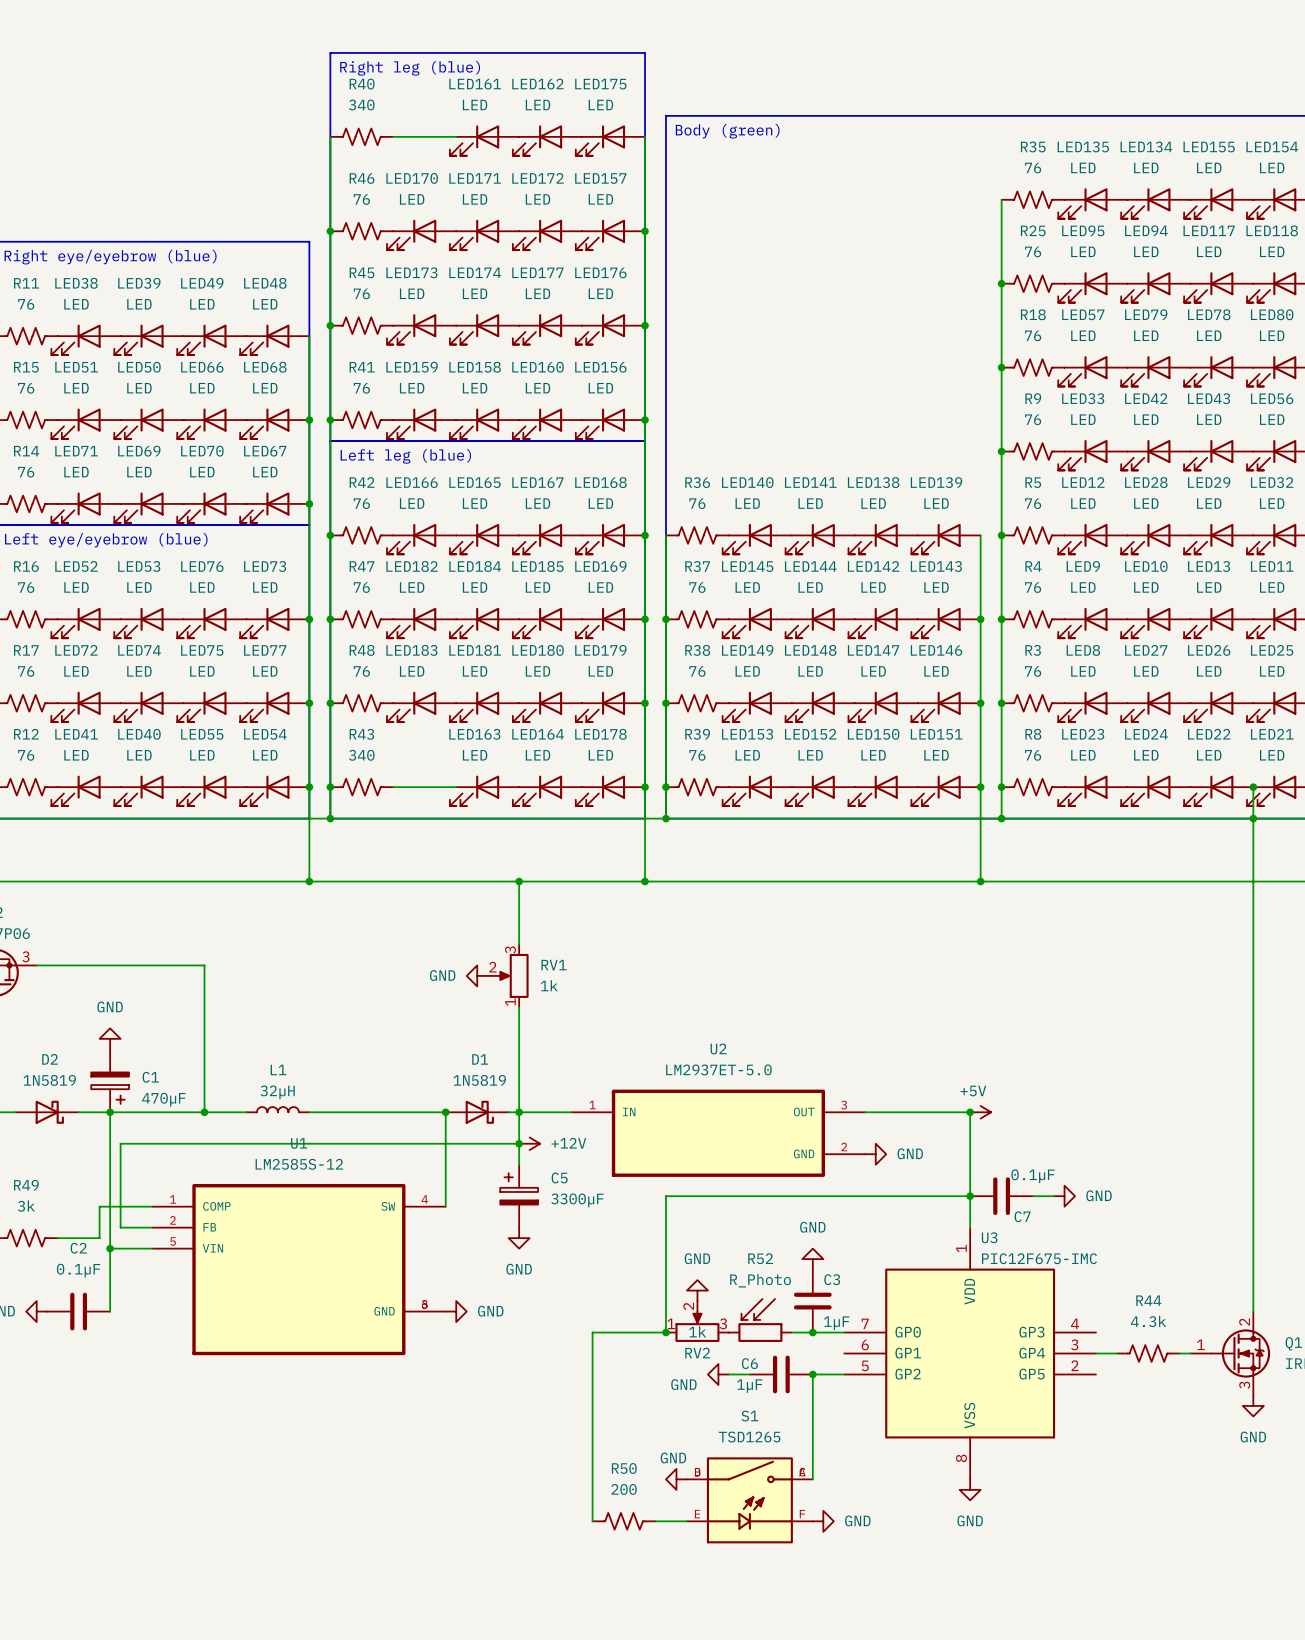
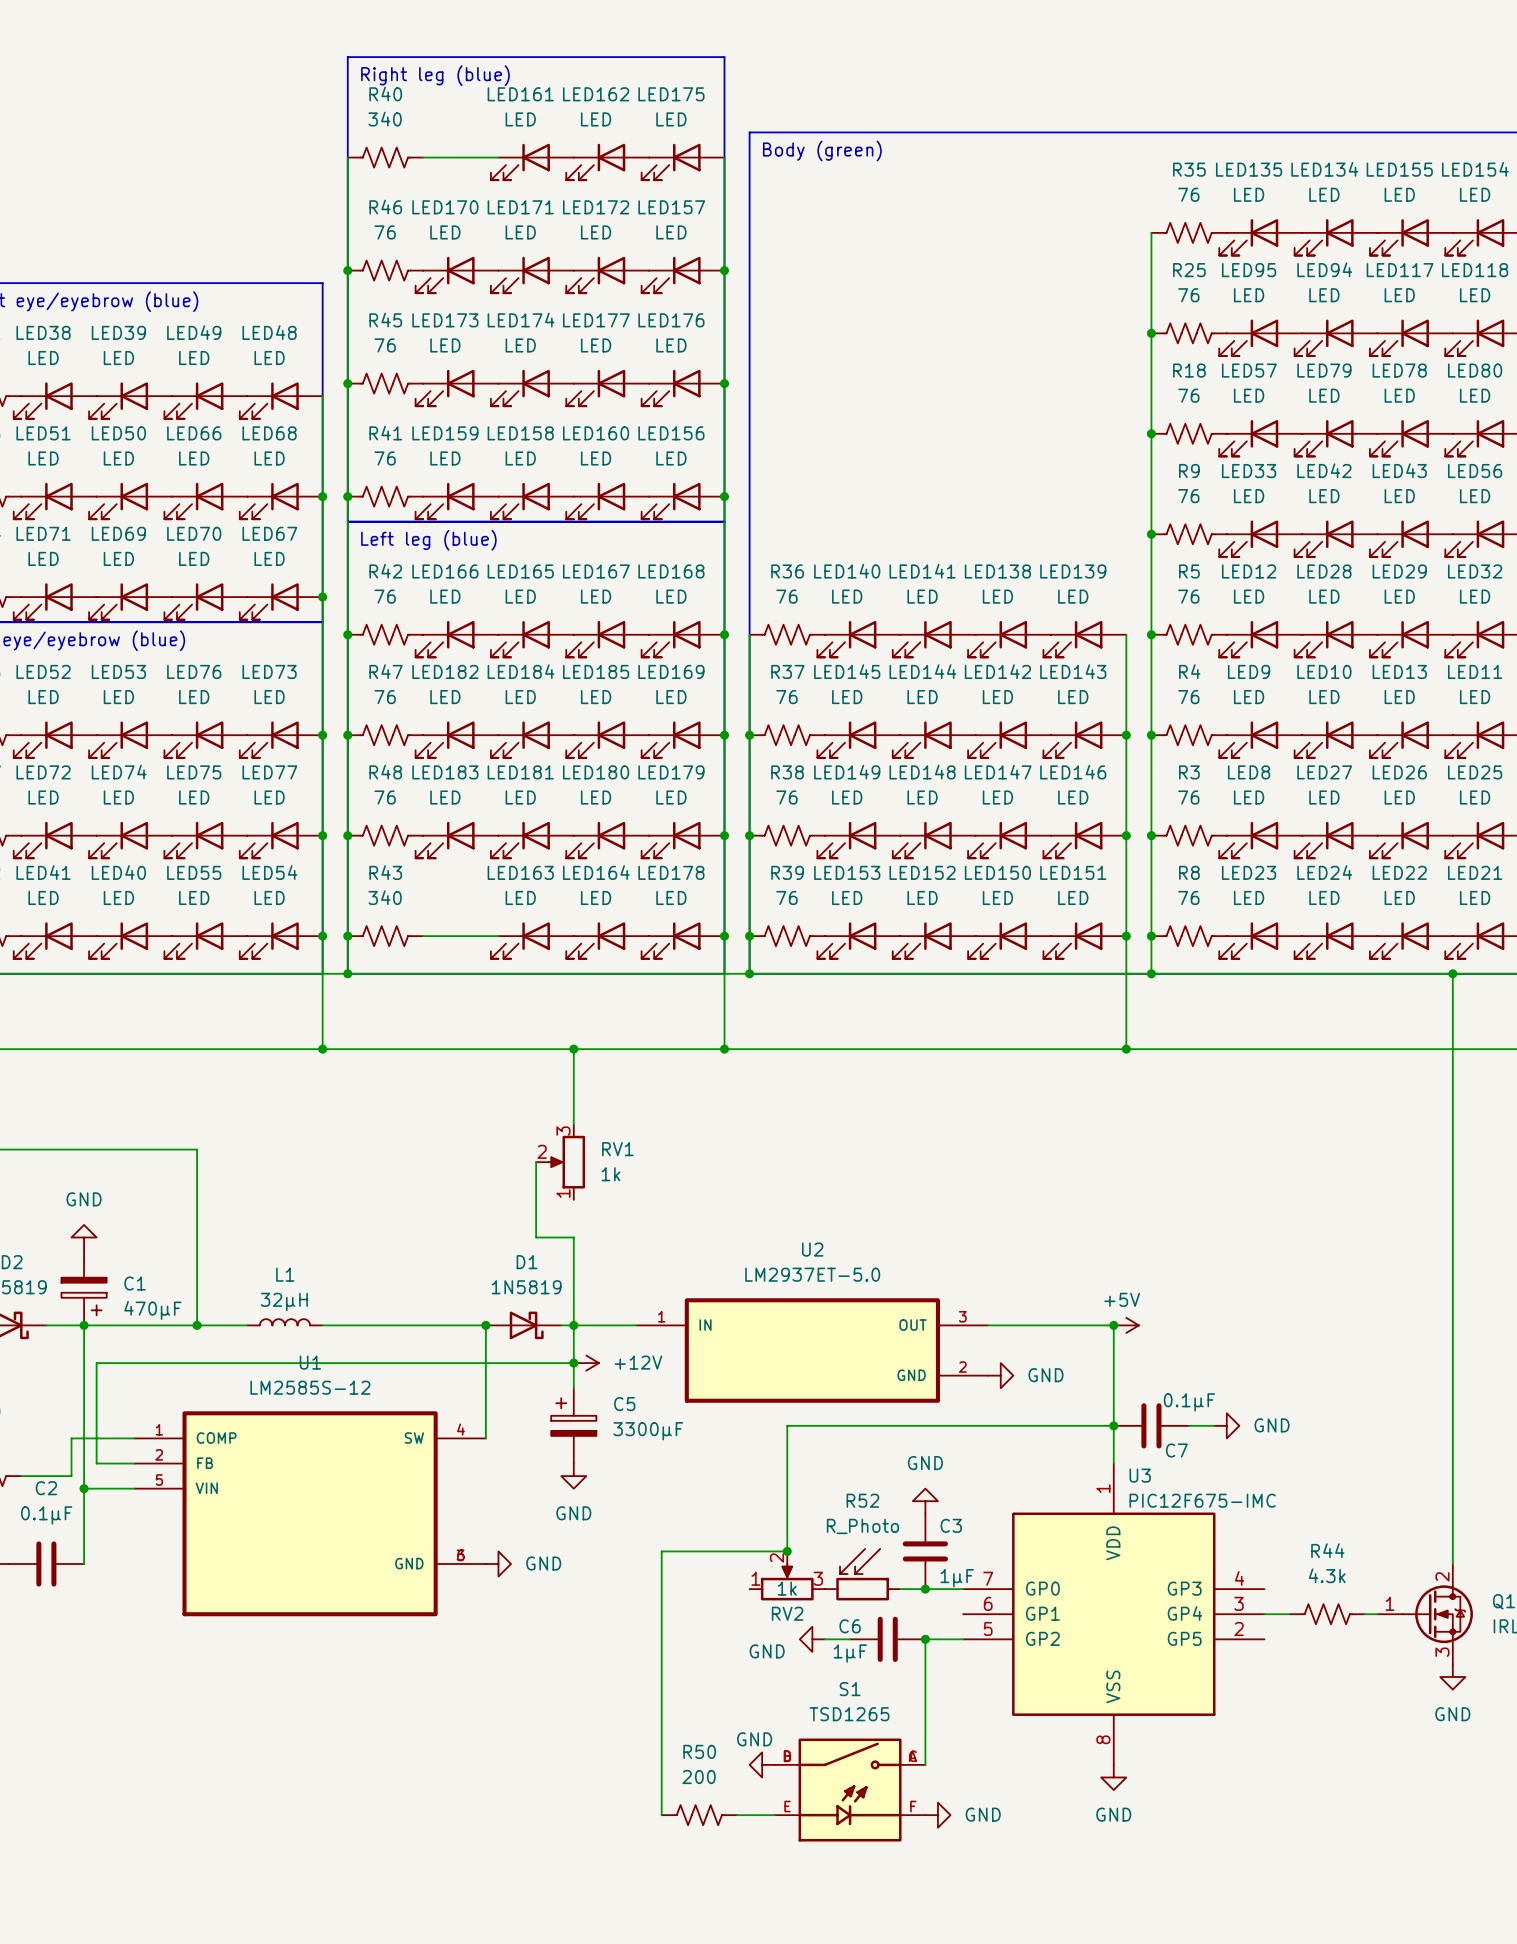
wire: (1253, 787) (1253, 818) -> none
junction: (1253, 787) -> none
power symbol: GND (477, 975) -> none
wire: (519, 1007) (519, 1038) -> (536, 1162) (536, 1237) (573, 1237)
wire: (697, 1196) (665, 1196) (665, 1332) (592, 1332) -> (787, 1425) (787, 1551) (661, 1551) (661, 1589)
power symbol: GND (697, 1290) -> none
junction position: (665, 1332) -> (787, 1551)

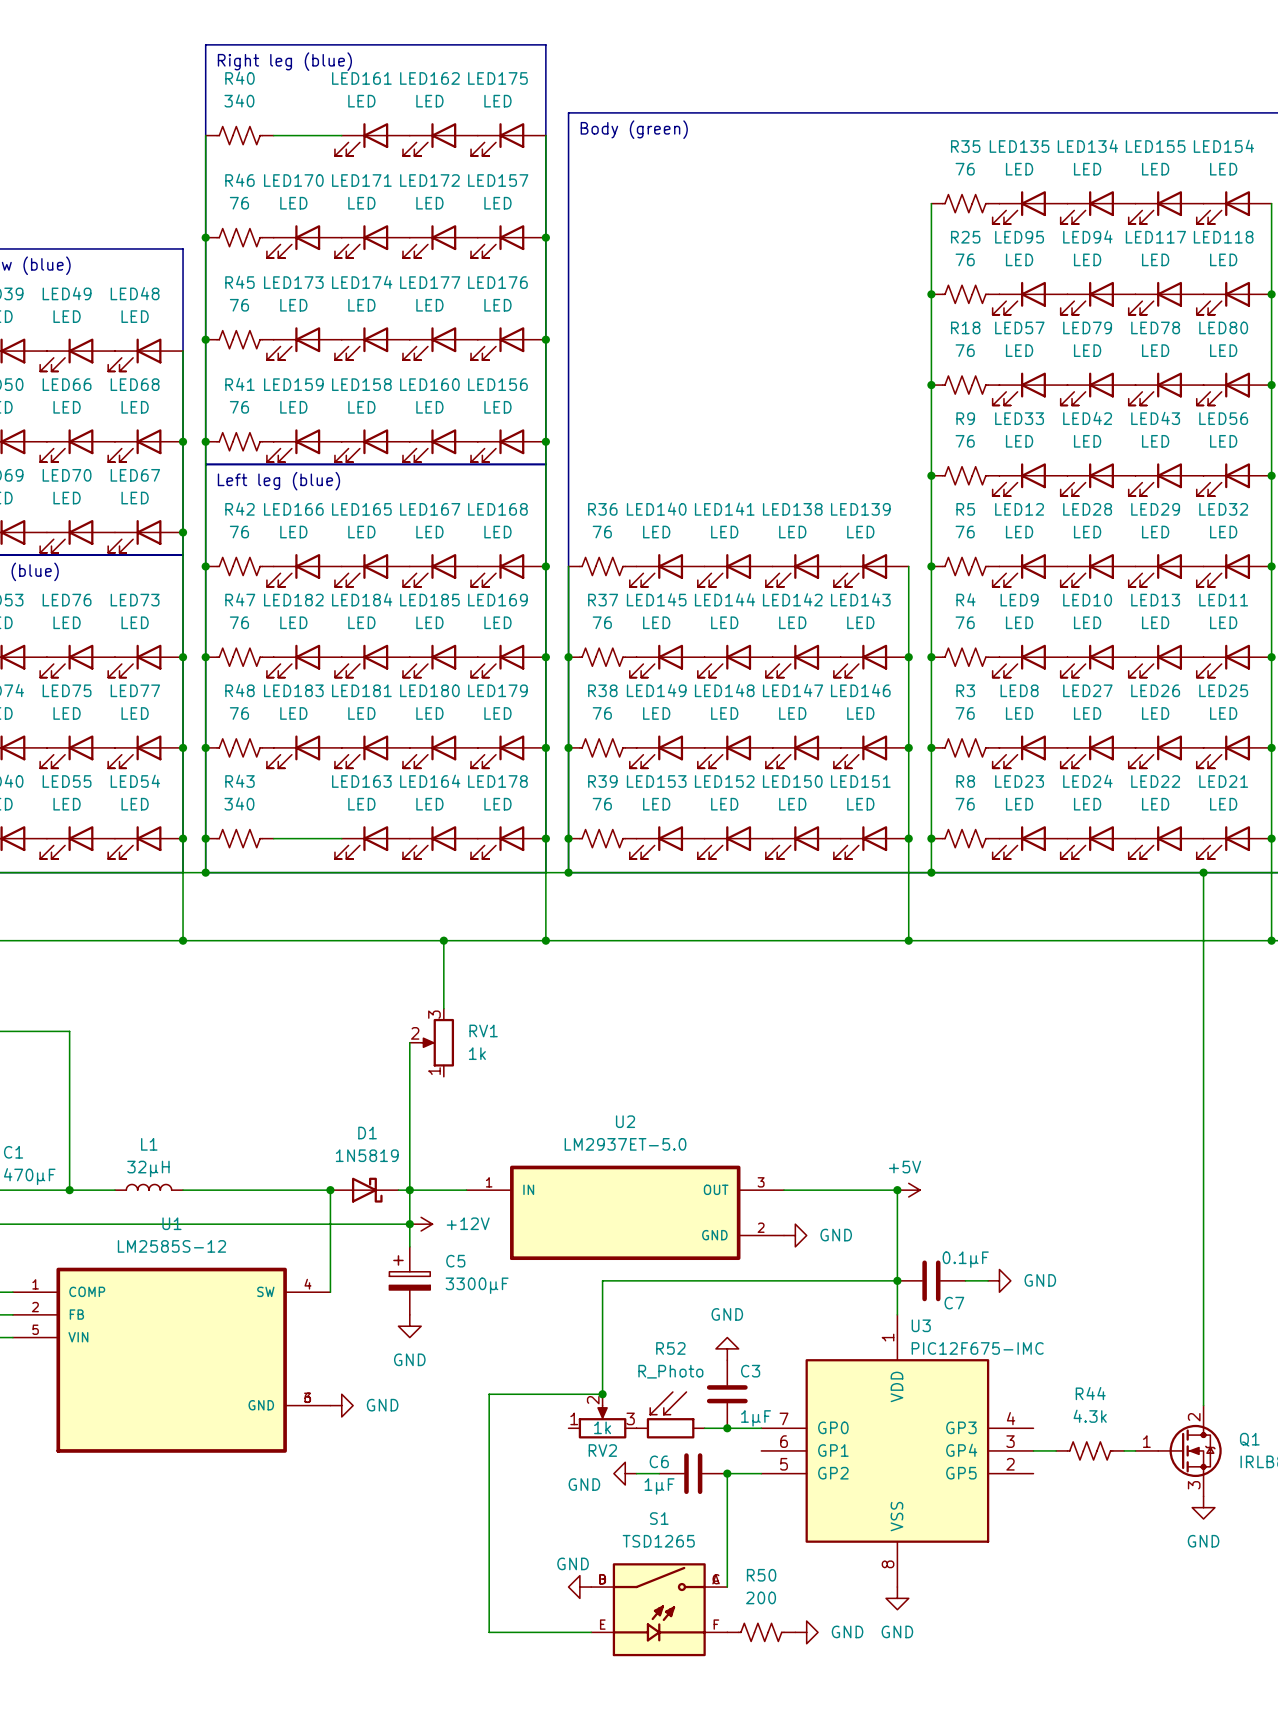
wire: (573, 1049) (573, 1124) -> (443, 940) (443, 1008)
junction position: (573, 1049) -> (443, 940)
wire: (536, 1162) (536, 1237) (573, 1237) -> (409, 1042) (409, 1110)
RV1 position: (560, 1162) -> (431, 1042)
R50 position: (699, 1815) -> (761, 1632)
power symbol position: GND (937, 1815) -> GND (806, 1632)

